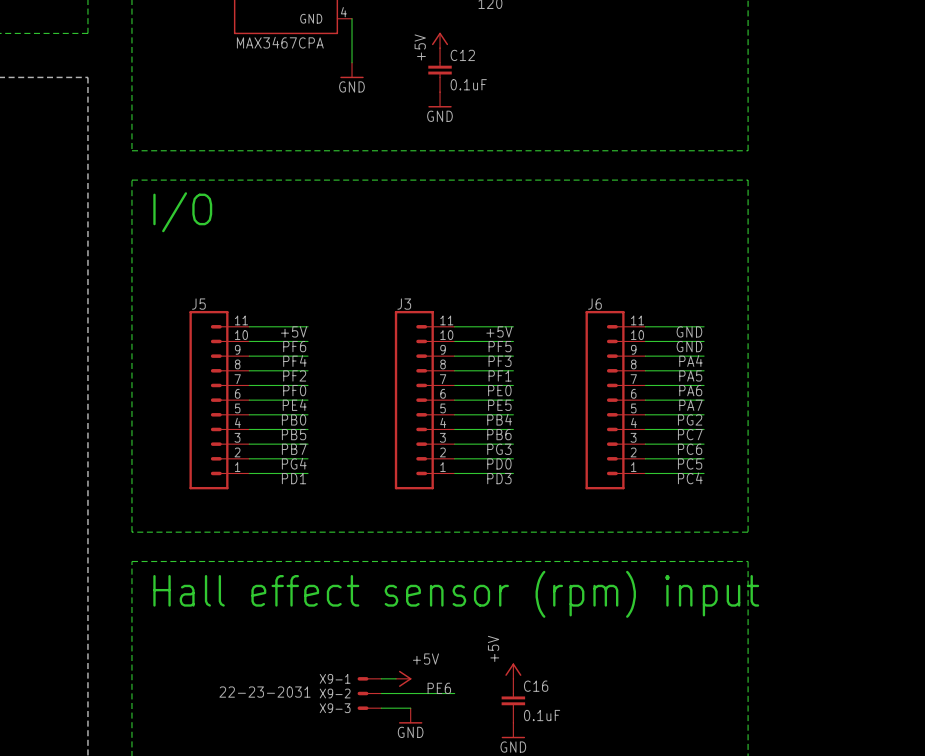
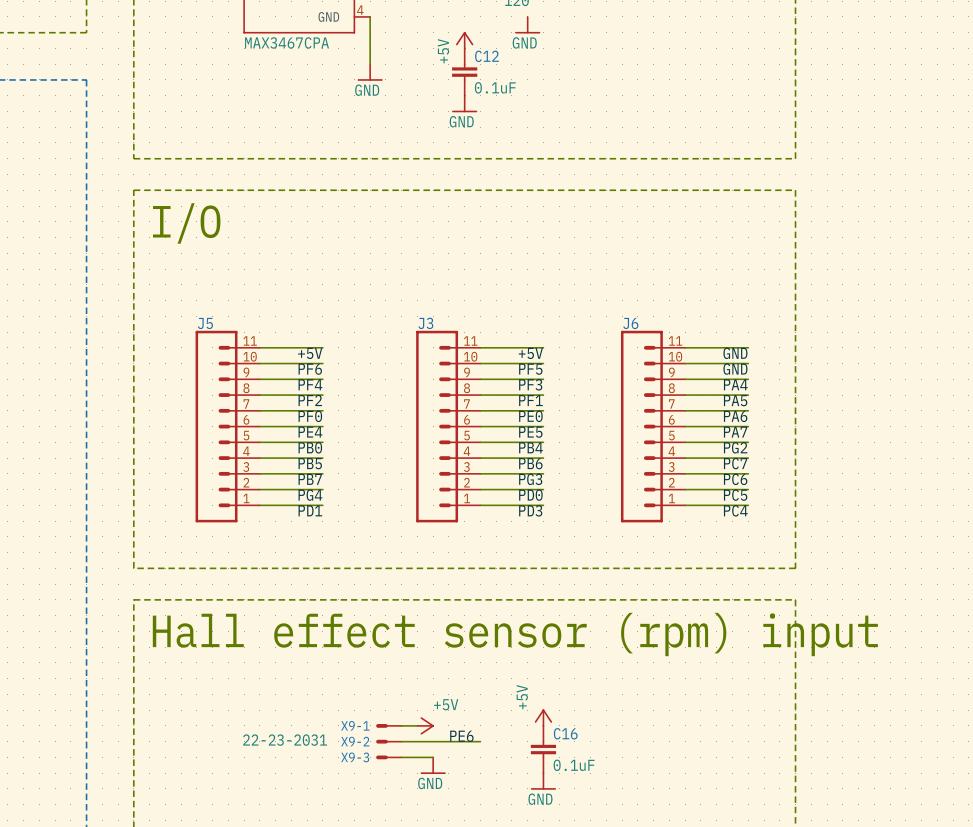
power symbol: none -> GND (527, 25)

